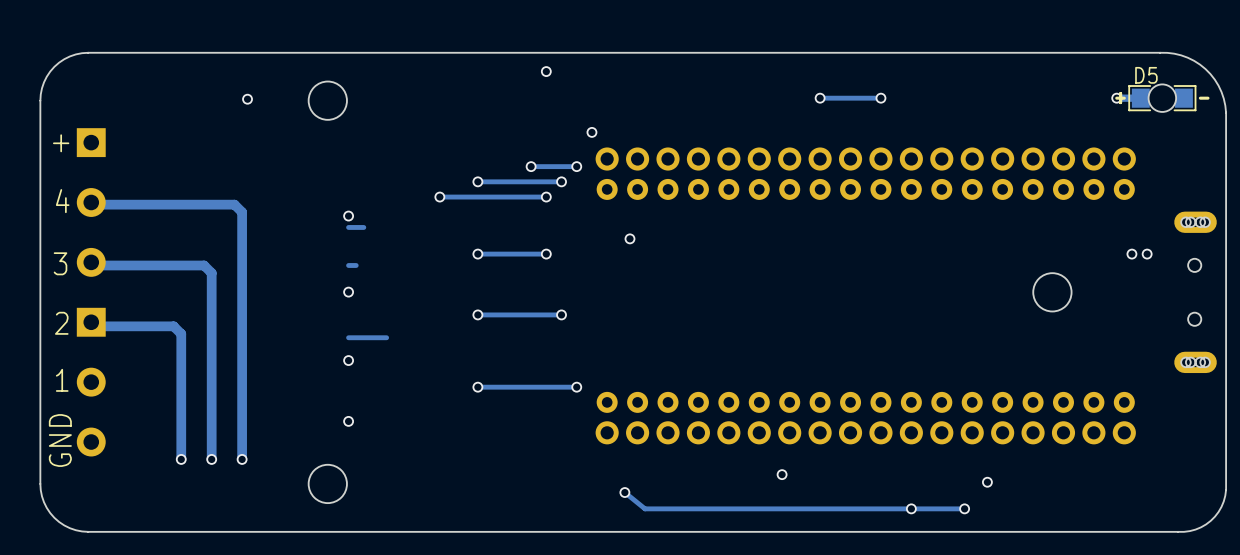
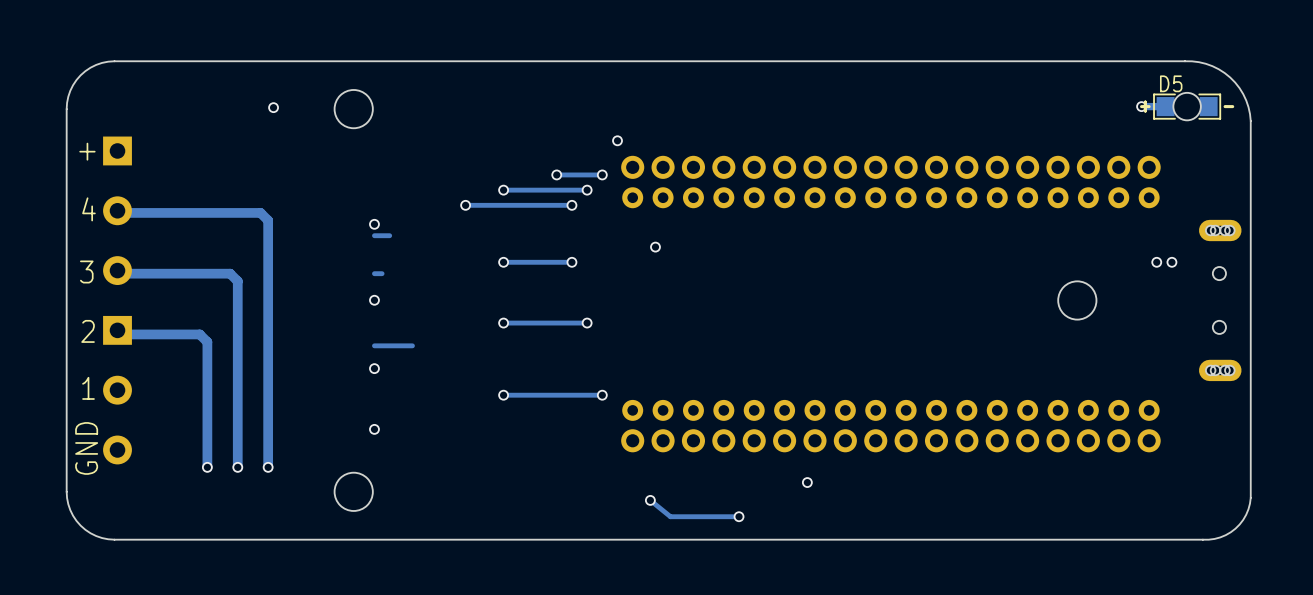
via: (546, 71) -> none
via: (820, 98) -> none
track: (880, 98) (820, 98) -> none
via: (880, 98) -> none
via: (987, 482) -> none
via: none -> (739, 516)
via: (911, 508) -> none
track: (964, 508) (713, 508) -> none
via: (964, 508) -> none

